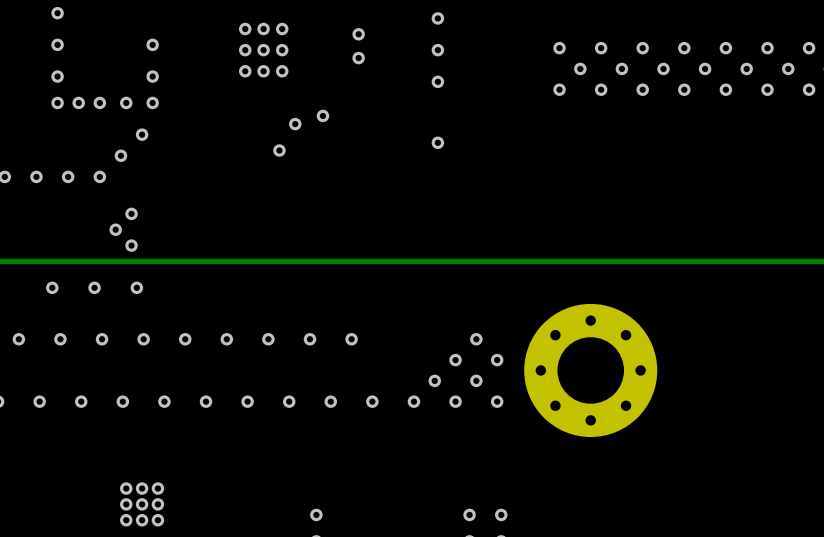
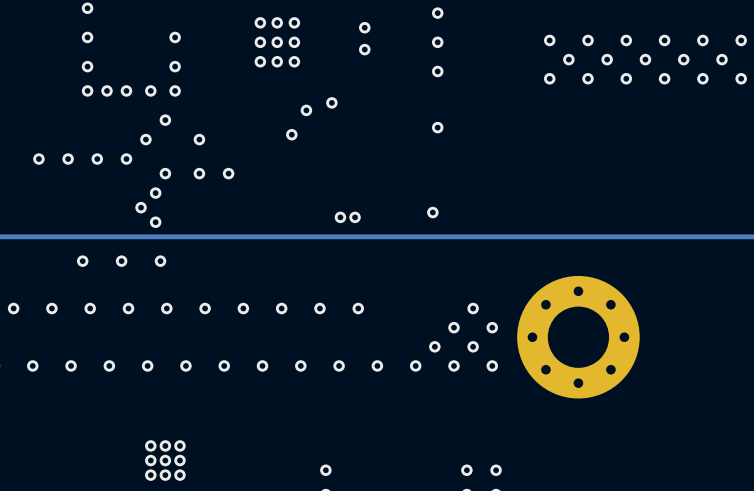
via: none -> (199, 139)
via: none -> (165, 173)
via: none -> (199, 173)
via: none -> (228, 173)
via: none -> (432, 212)
via: none -> (340, 217)
via: none -> (355, 217)

